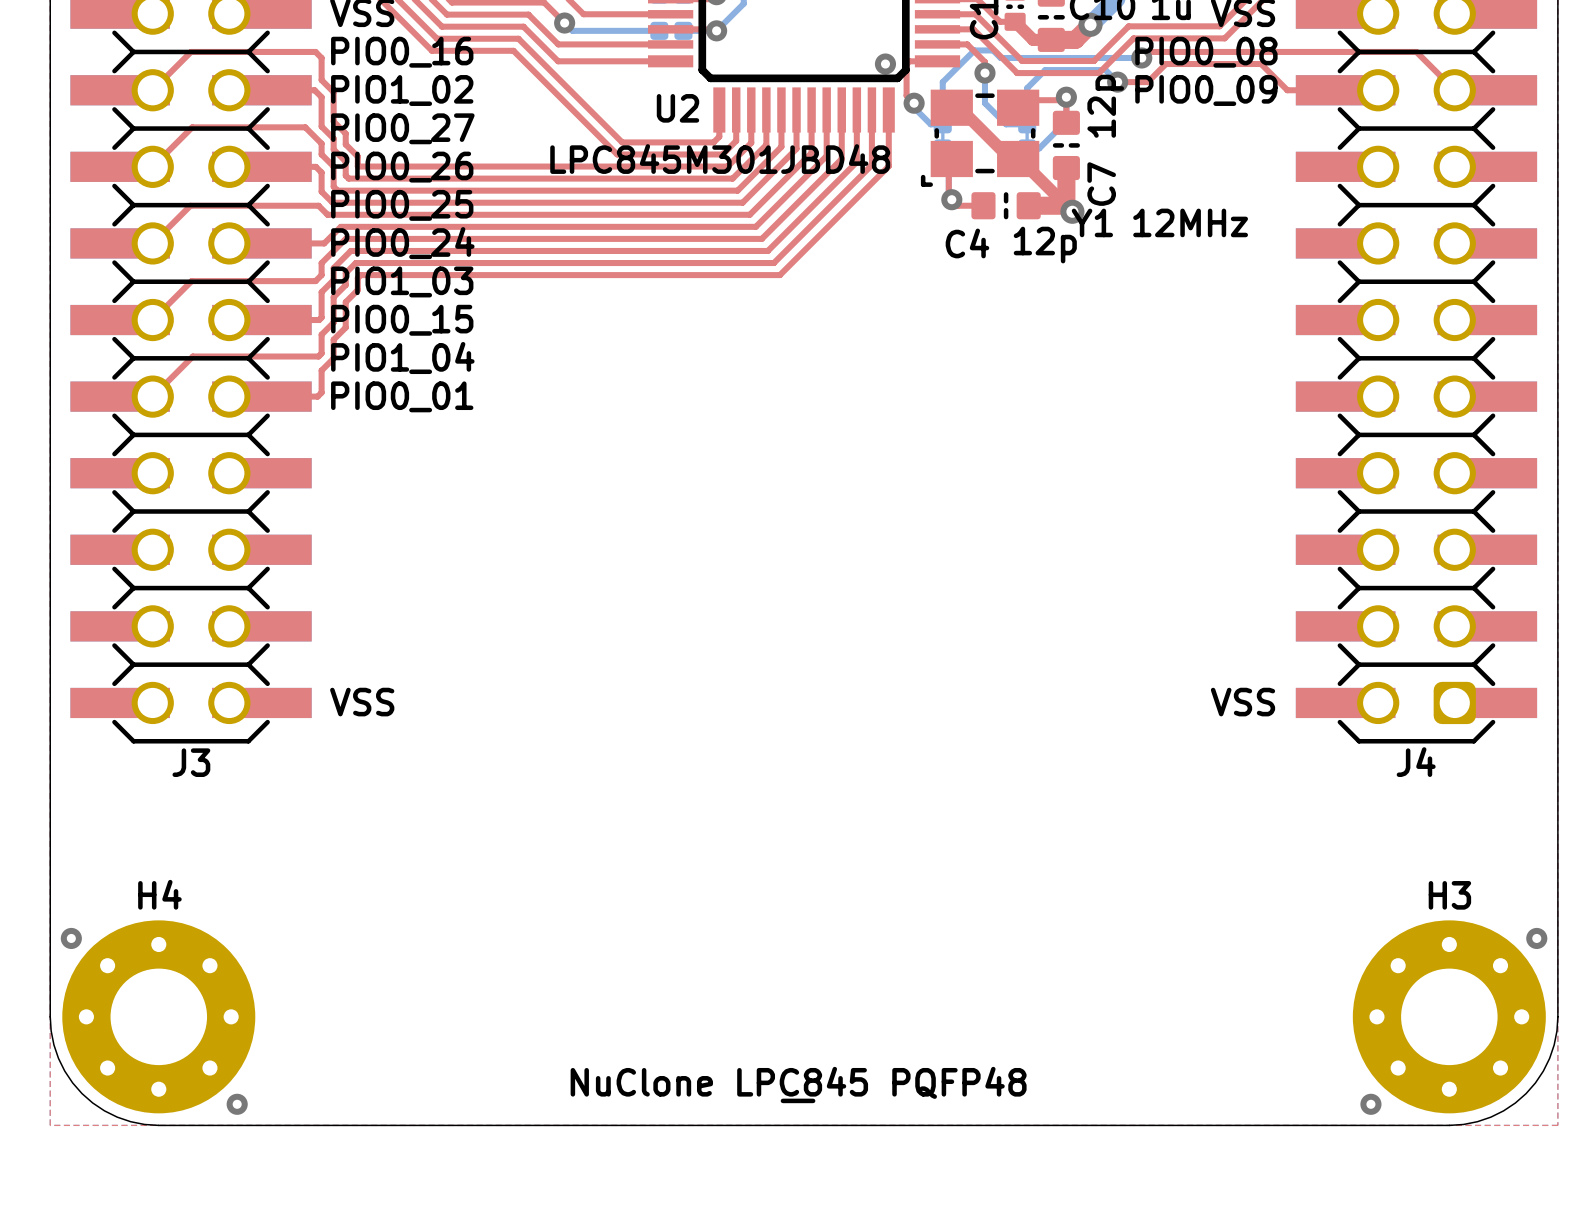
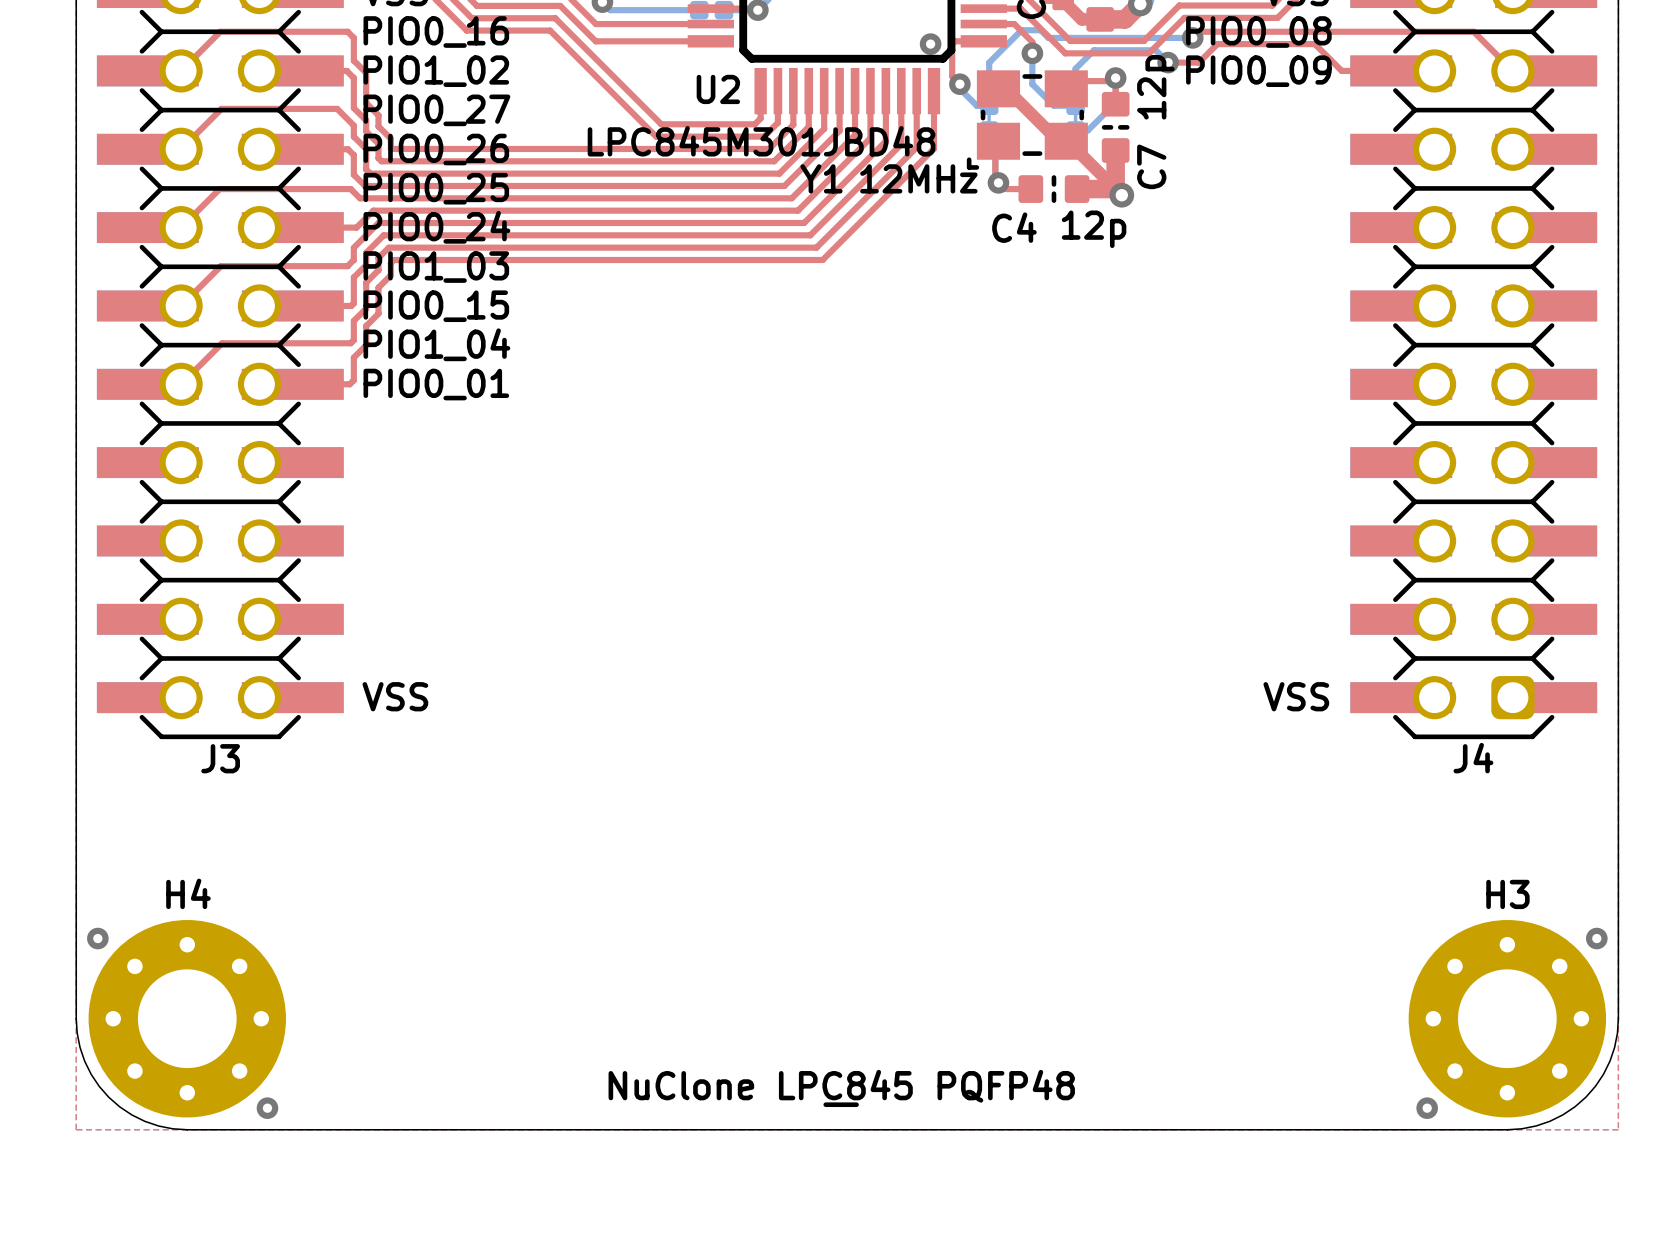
Y1 name position: Y1 (1092, 222) -> Y1 (821, 178)
Y1 value position: 12MHz (1190, 222) -> 12MHz (918, 178)

